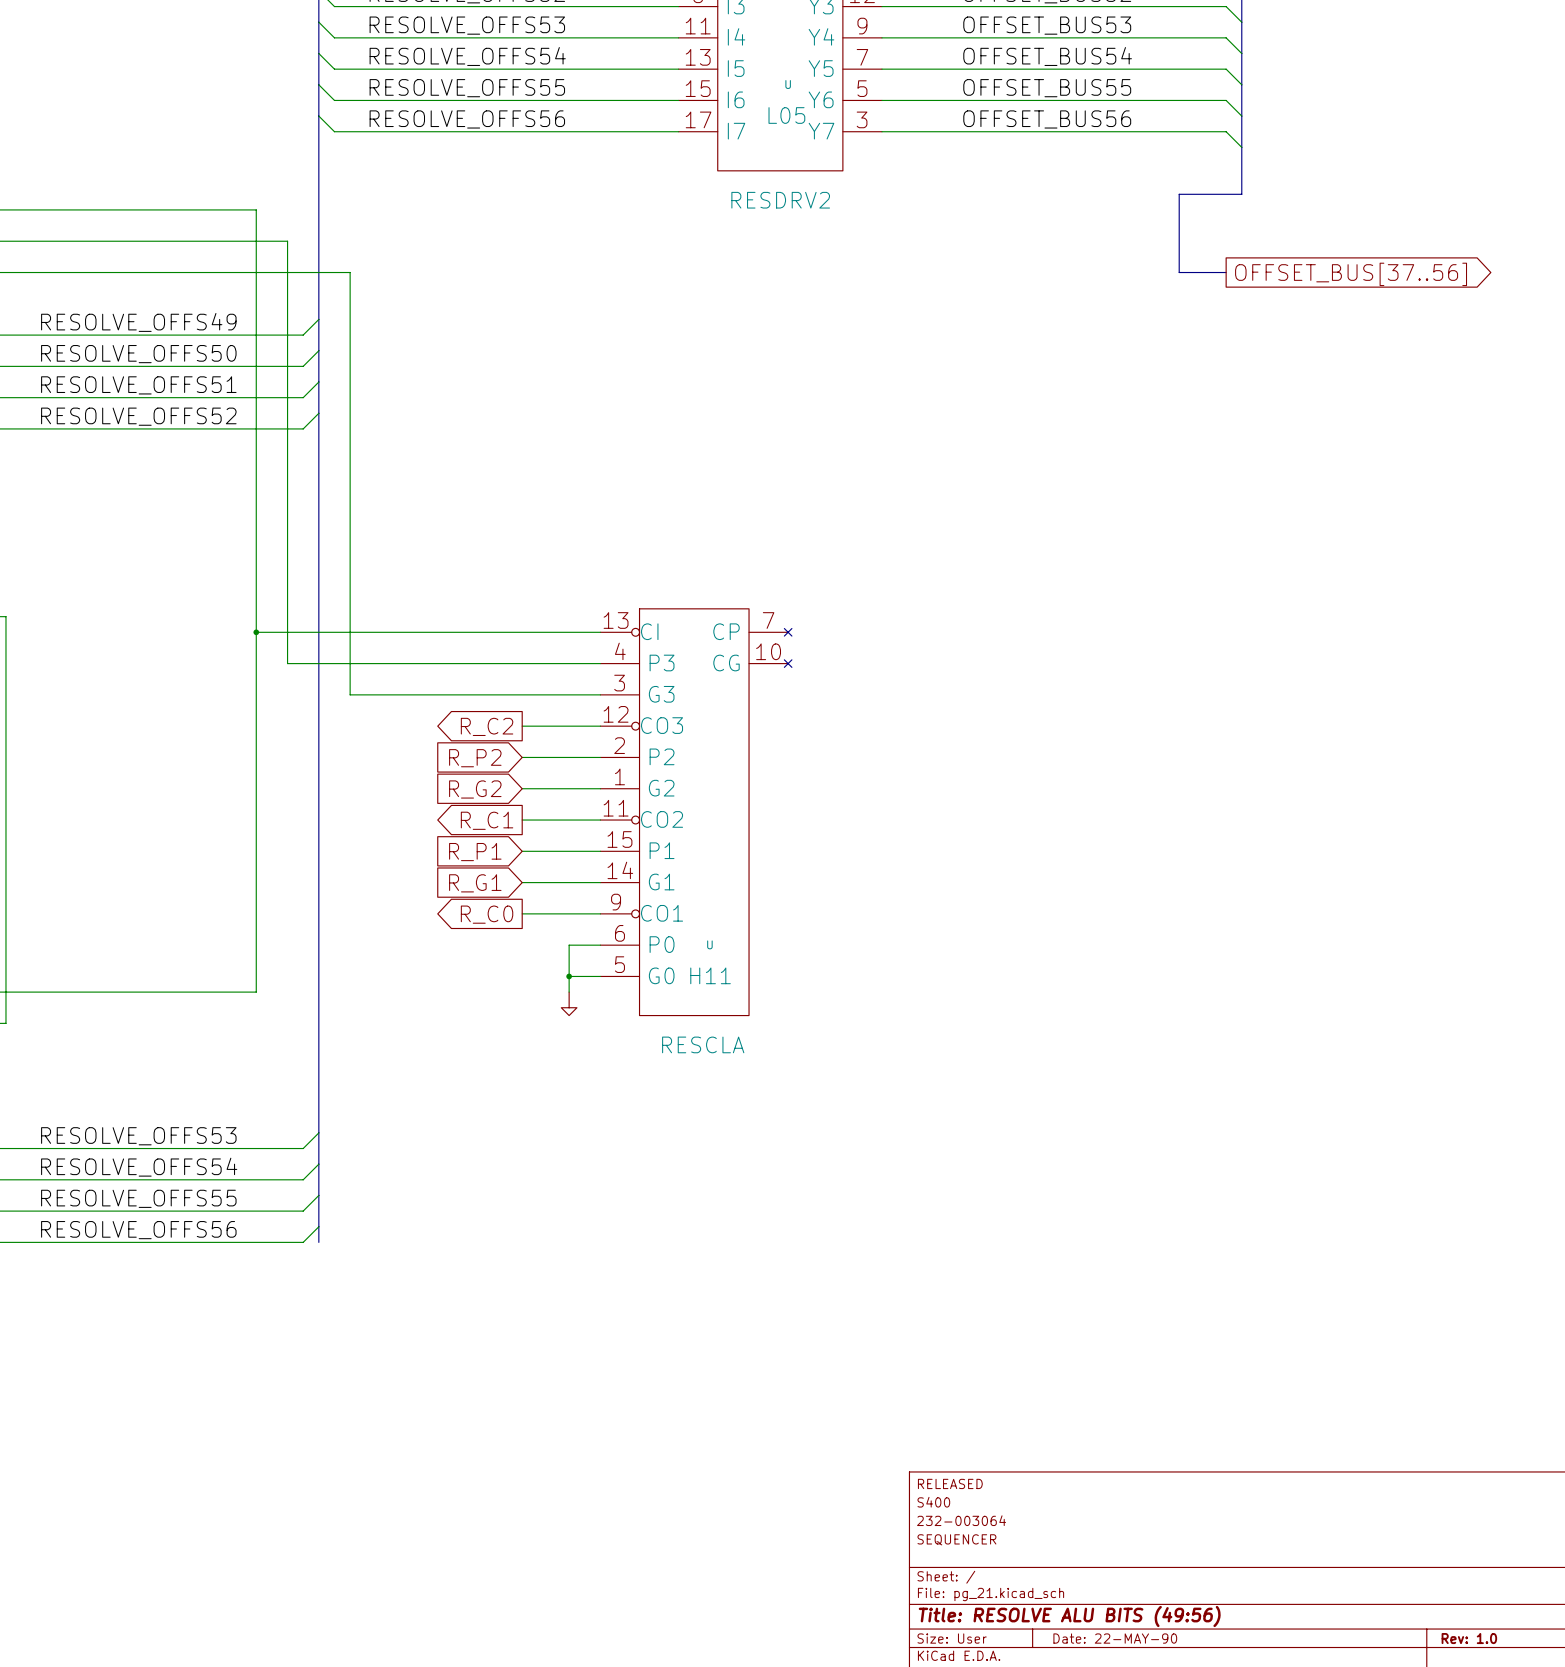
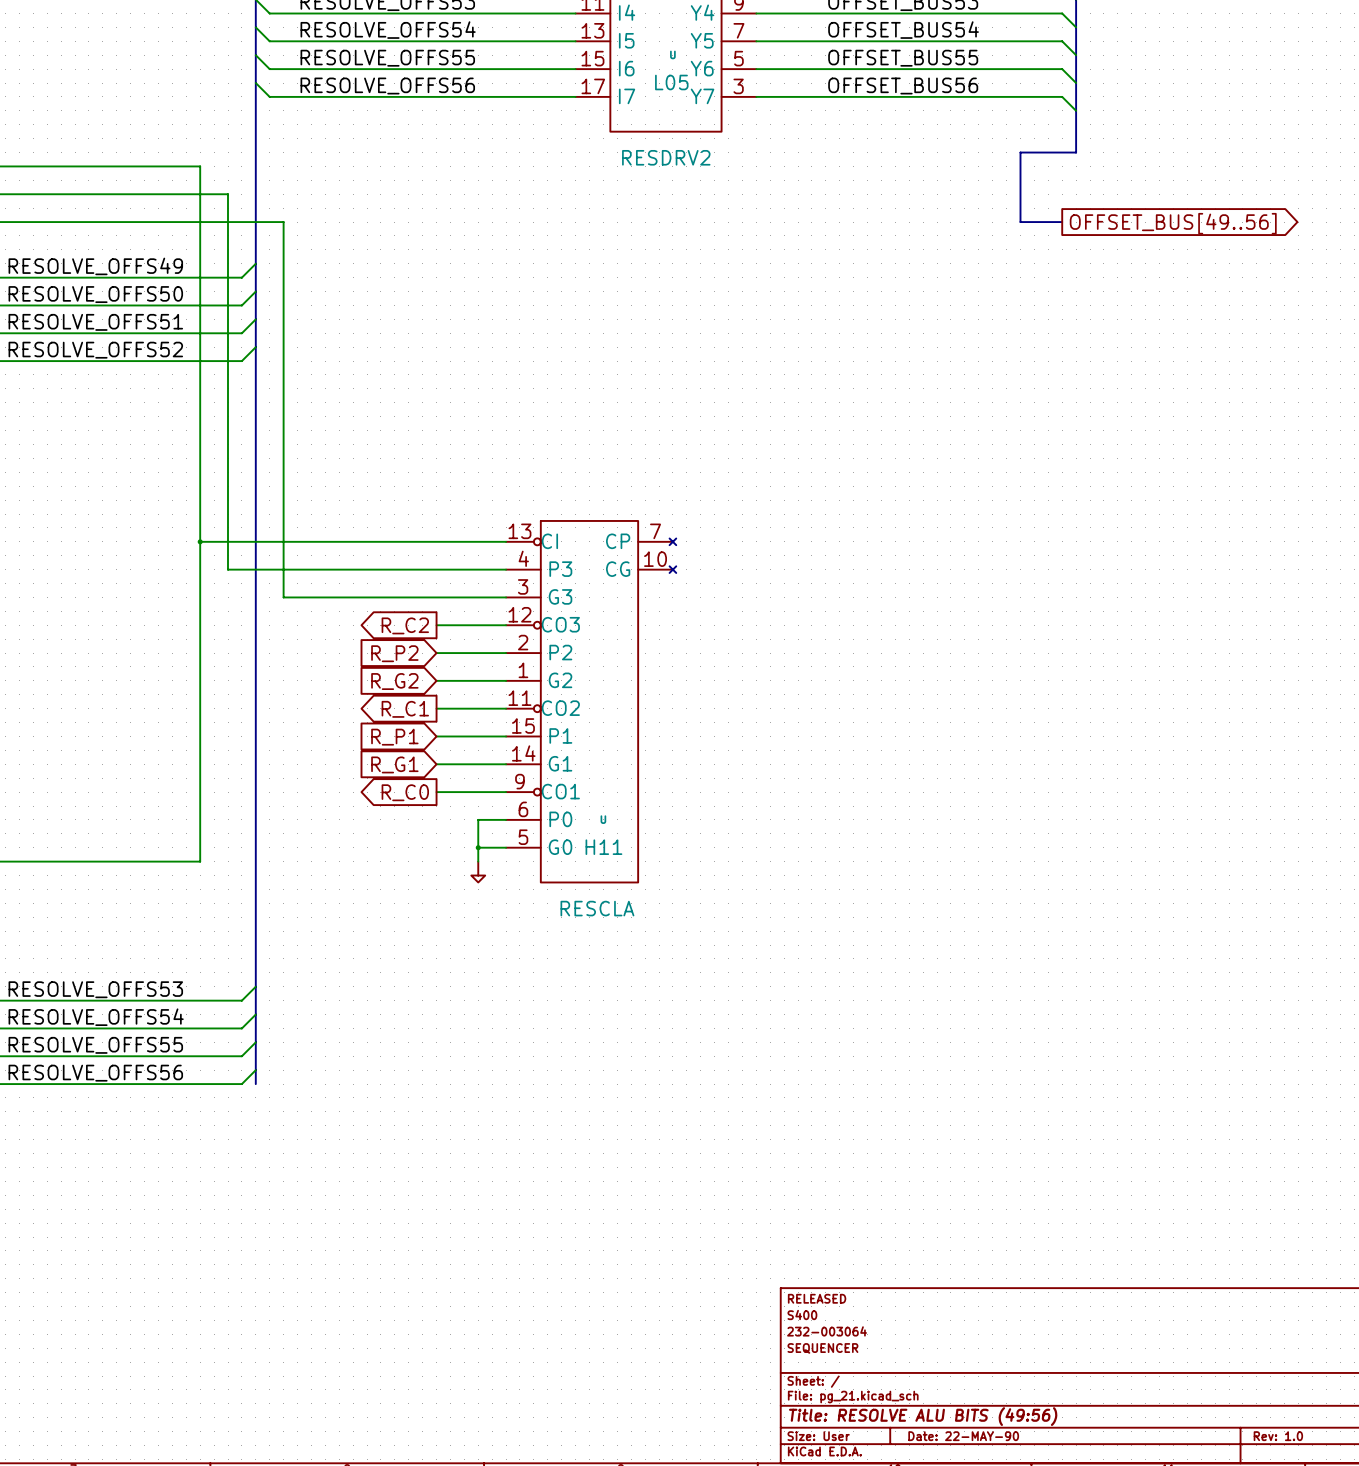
global label: OFFSET_BUS[37..56] (1351, 274) -> OFFSET_BUS[49..56] (1173, 223)

